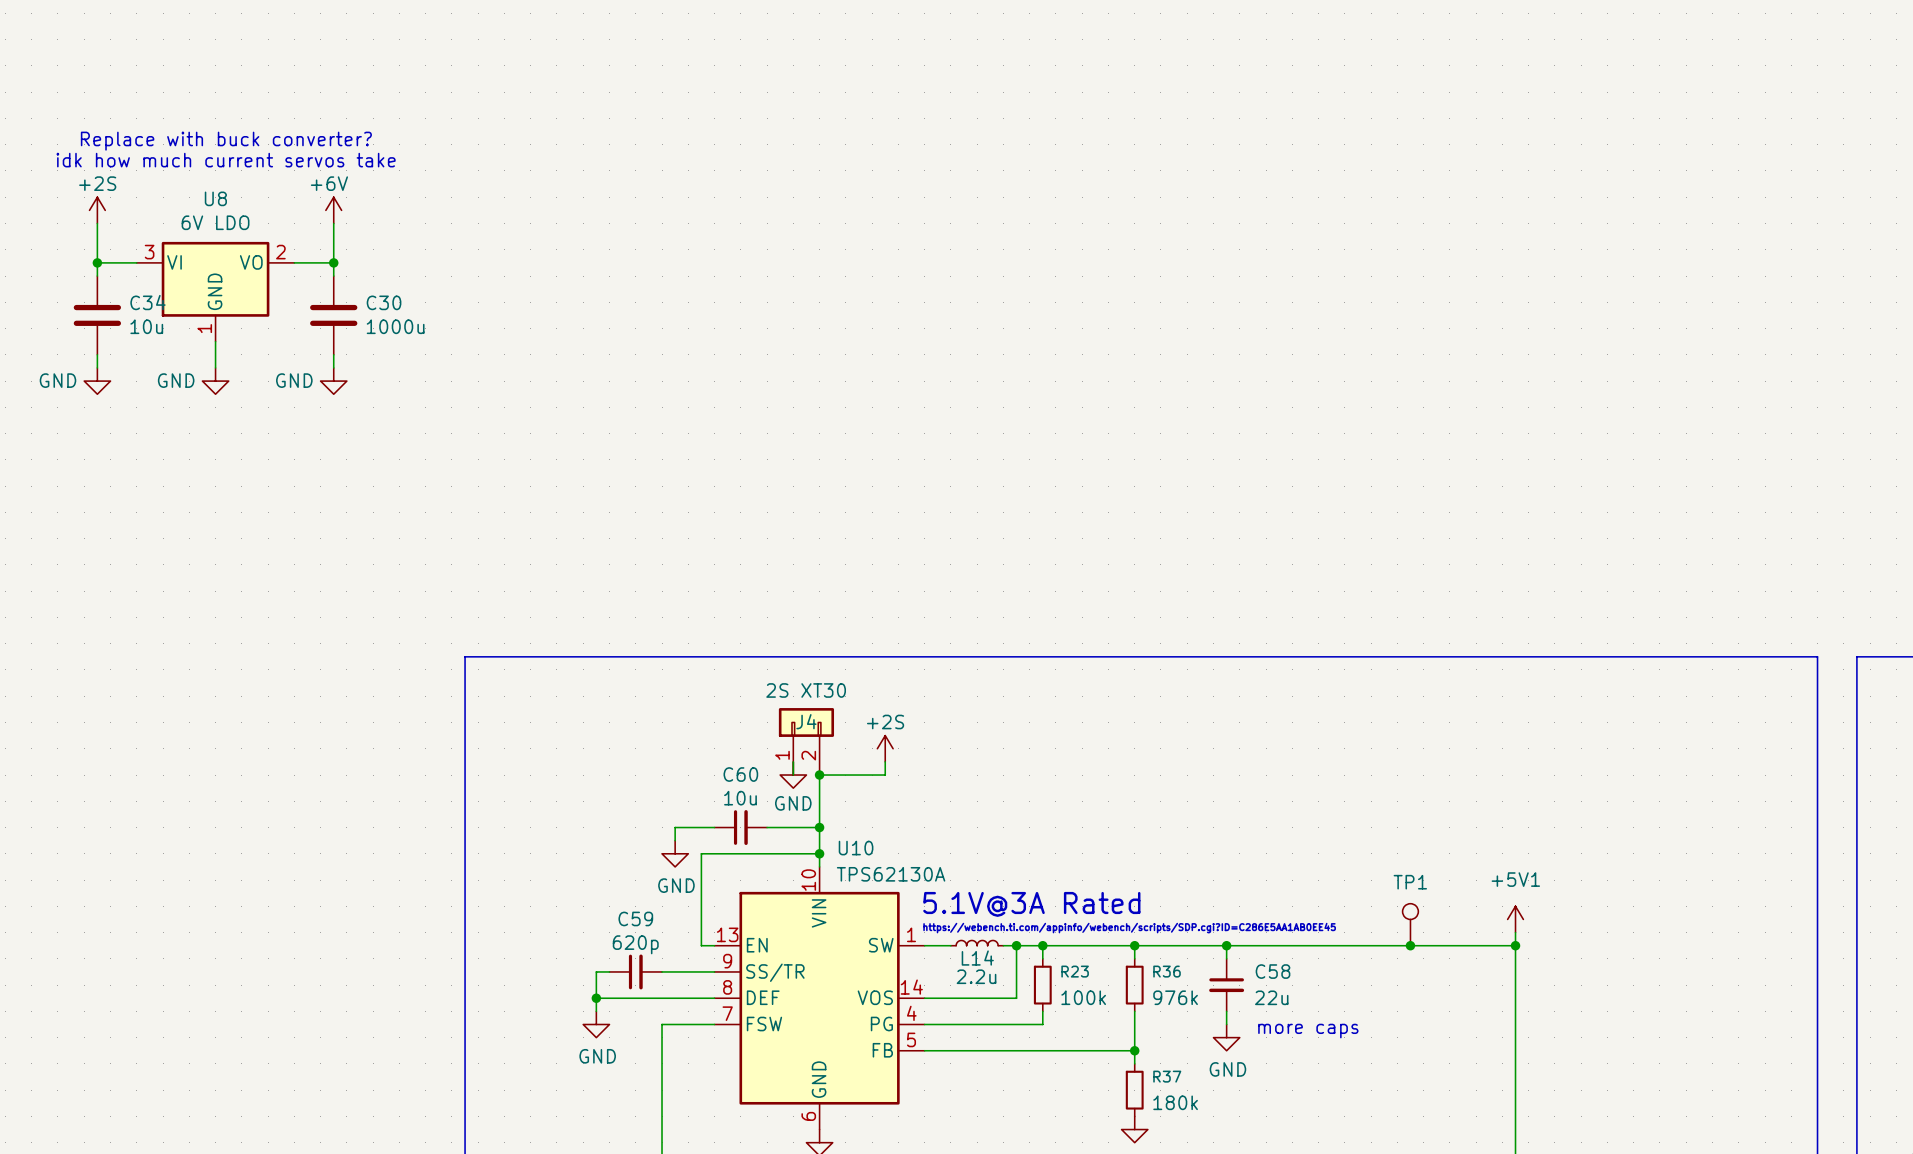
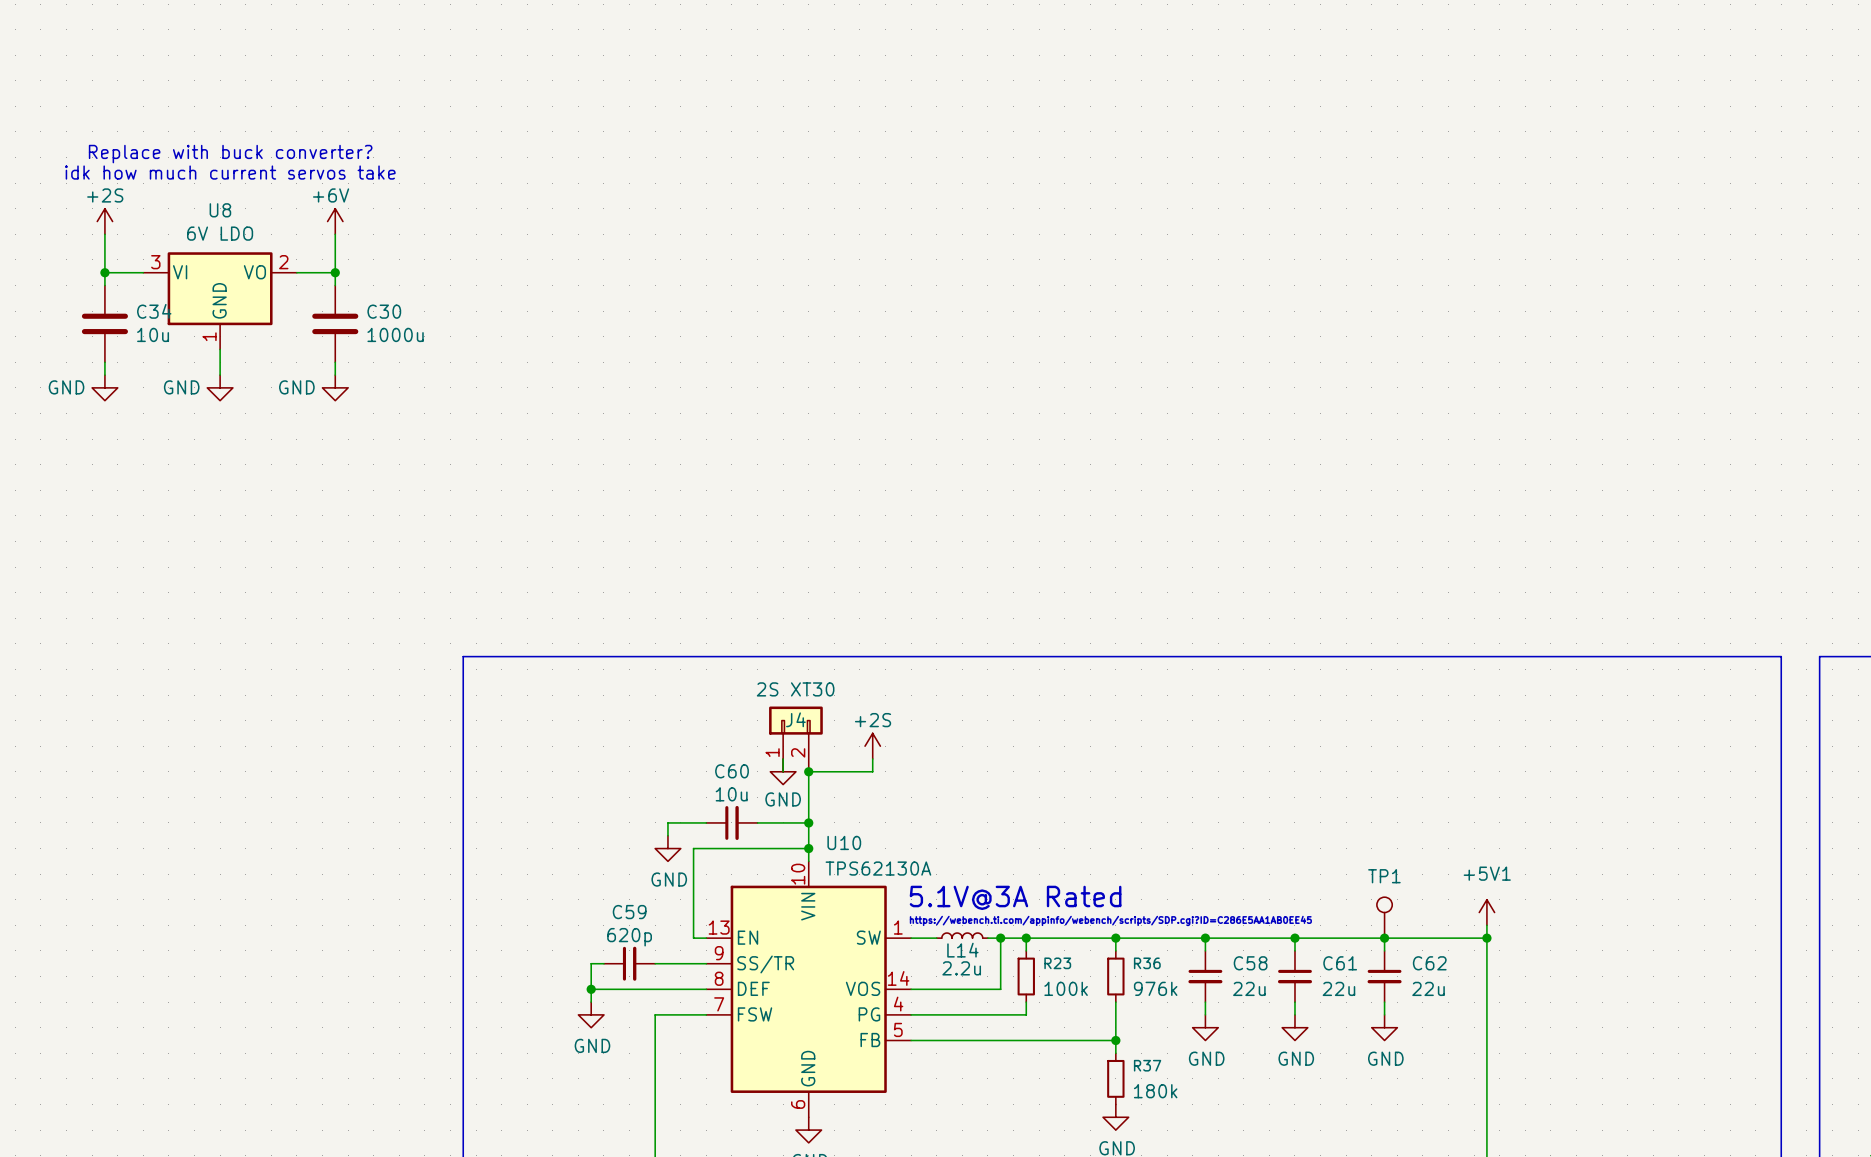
wire: none -> (1294, 938) (1294, 950)
junction: none -> (1294, 938)
wire: none -> (1384, 938) (1384, 950)
C61: none -> 22u (1294, 976)
C62: none -> 22u (1384, 976)
wire: none -> (1294, 1002) (1294, 1014)
wire: none -> (1384, 1002) (1384, 1014)
text: more caps (1308, 1031) -> none
power symbol: none -> GND (1294, 1027)
power symbol: none -> GND (1384, 1027)

